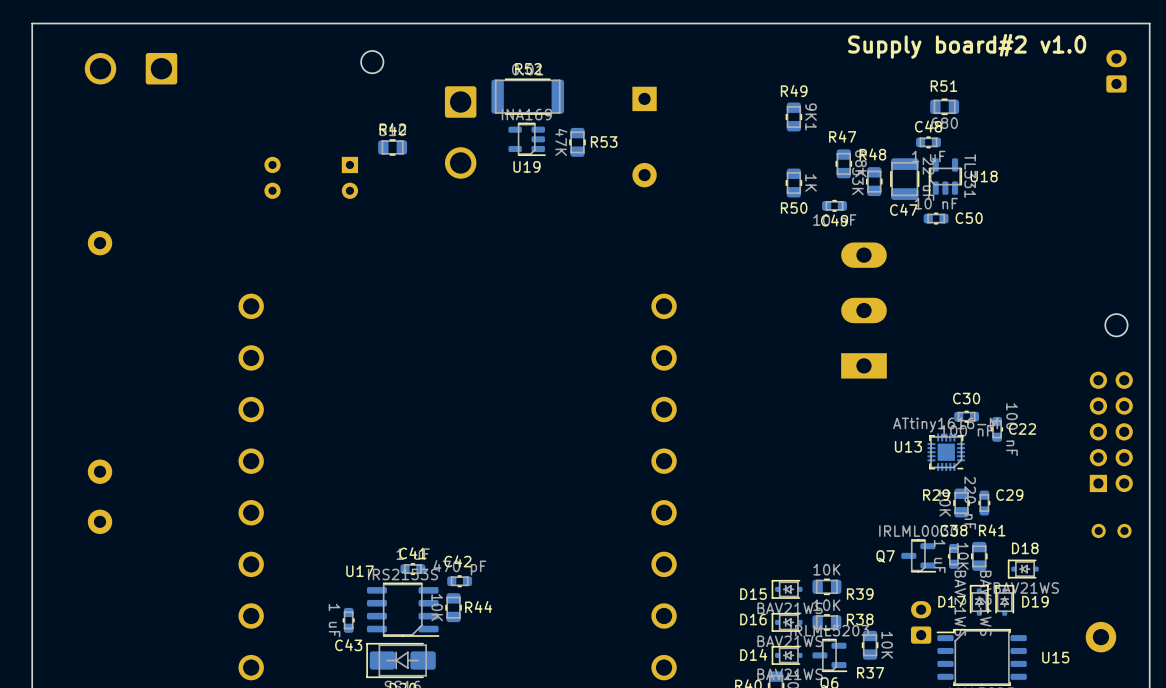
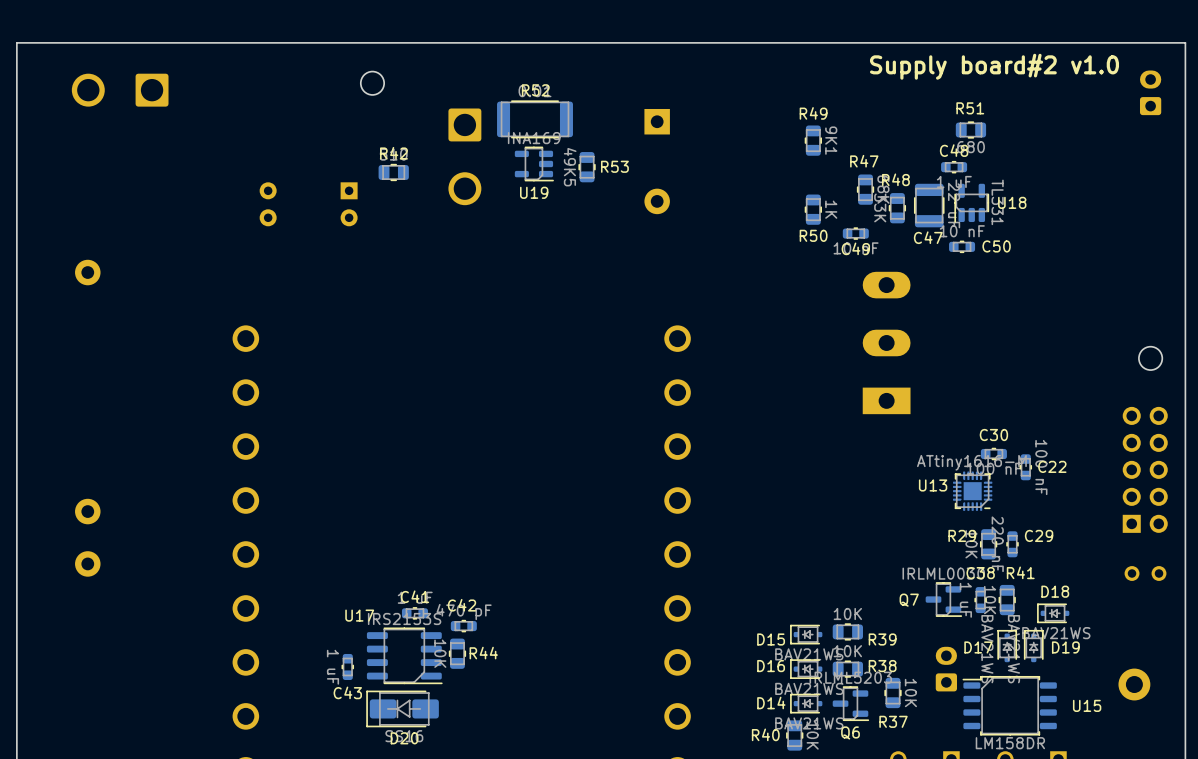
R53 value: 47K (561, 142) -> 49K5 (570, 167)

